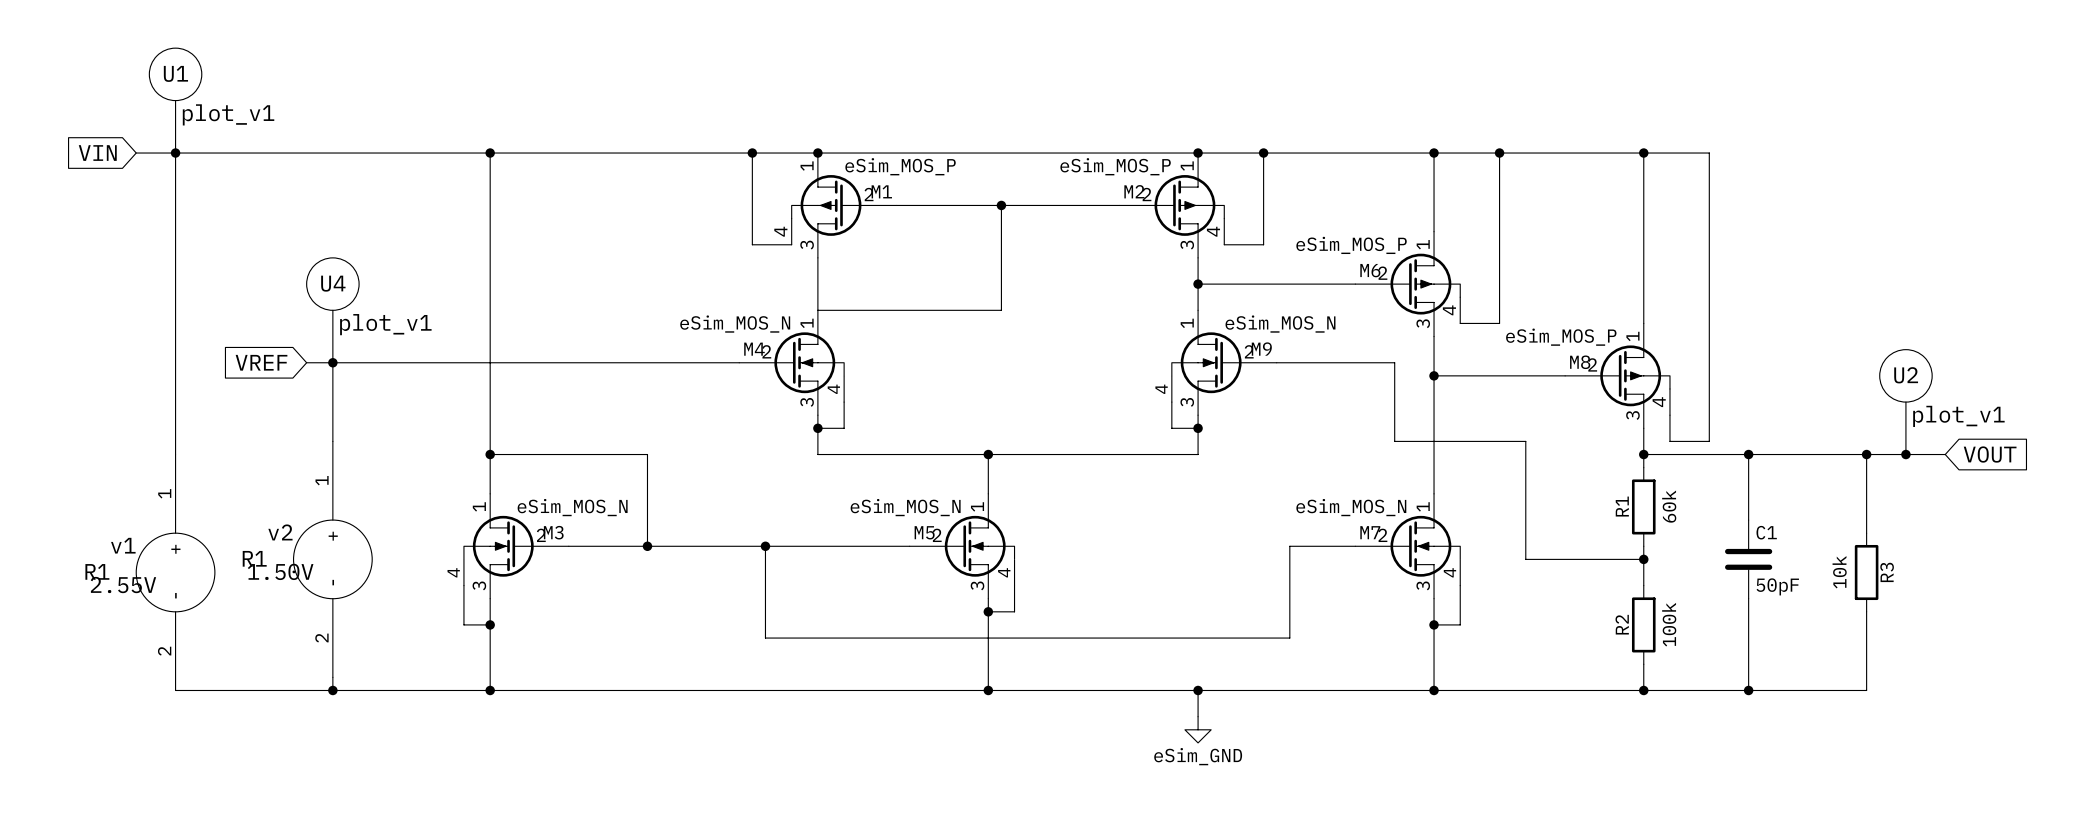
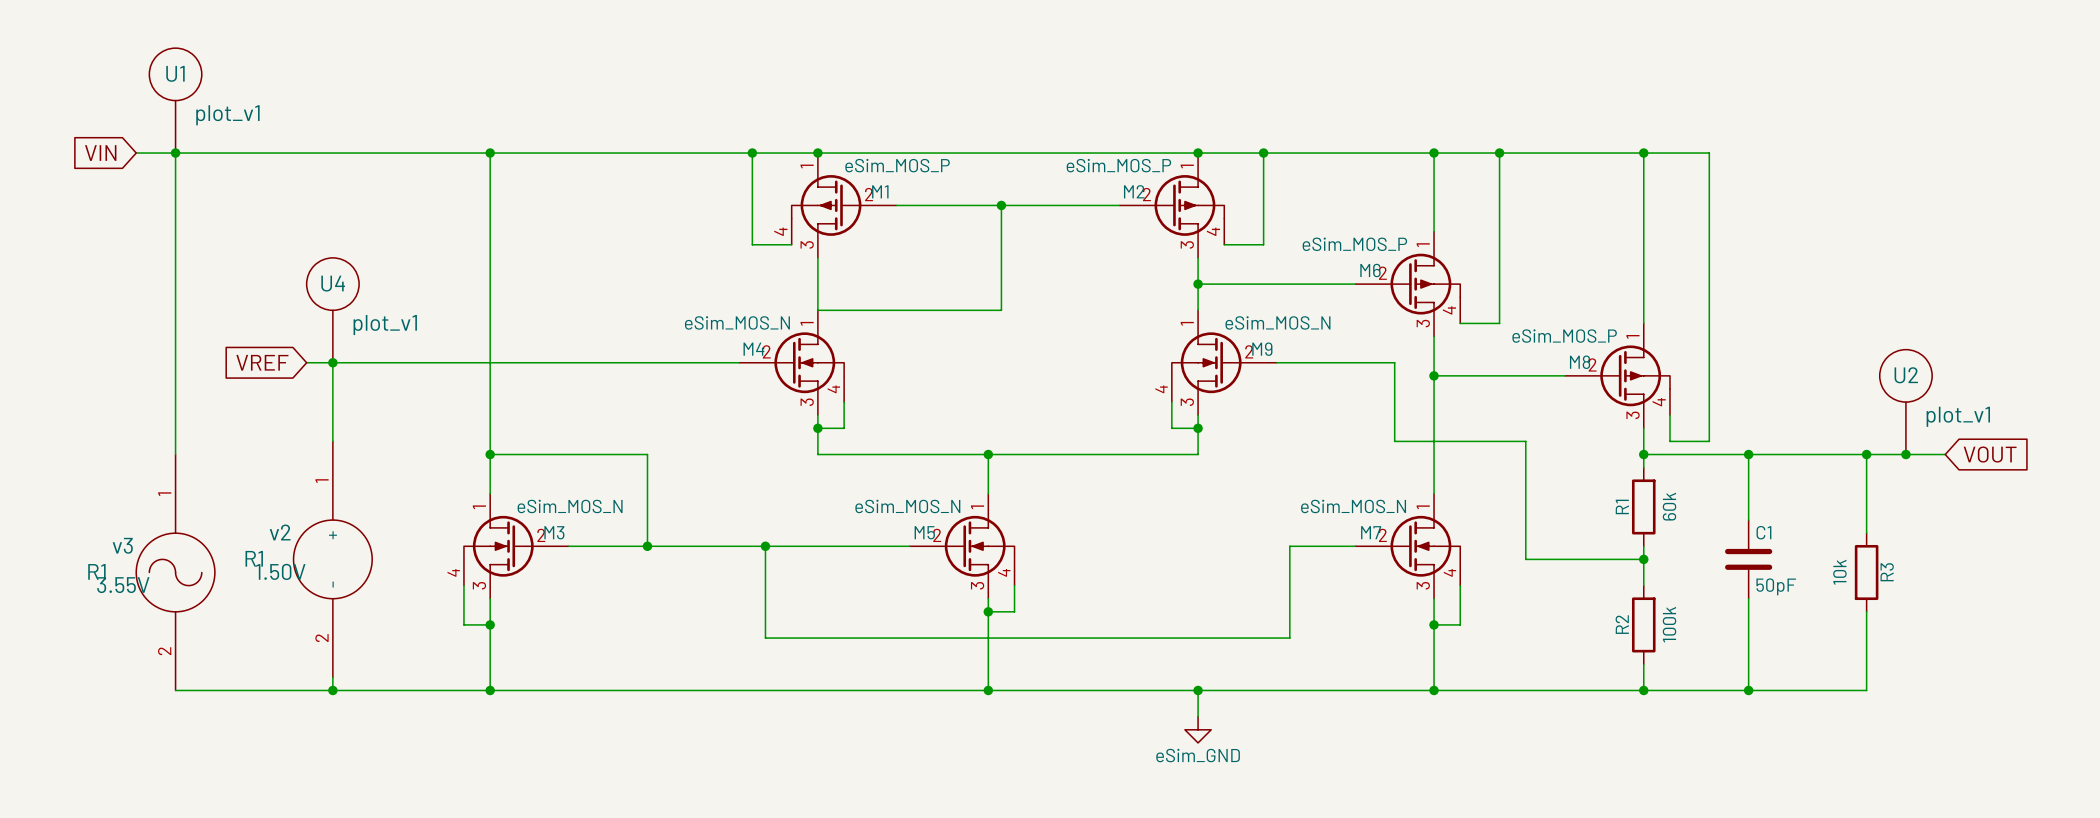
v1: 2.55V (175, 572) -> none
v3: none -> 3.55V (175, 572)

